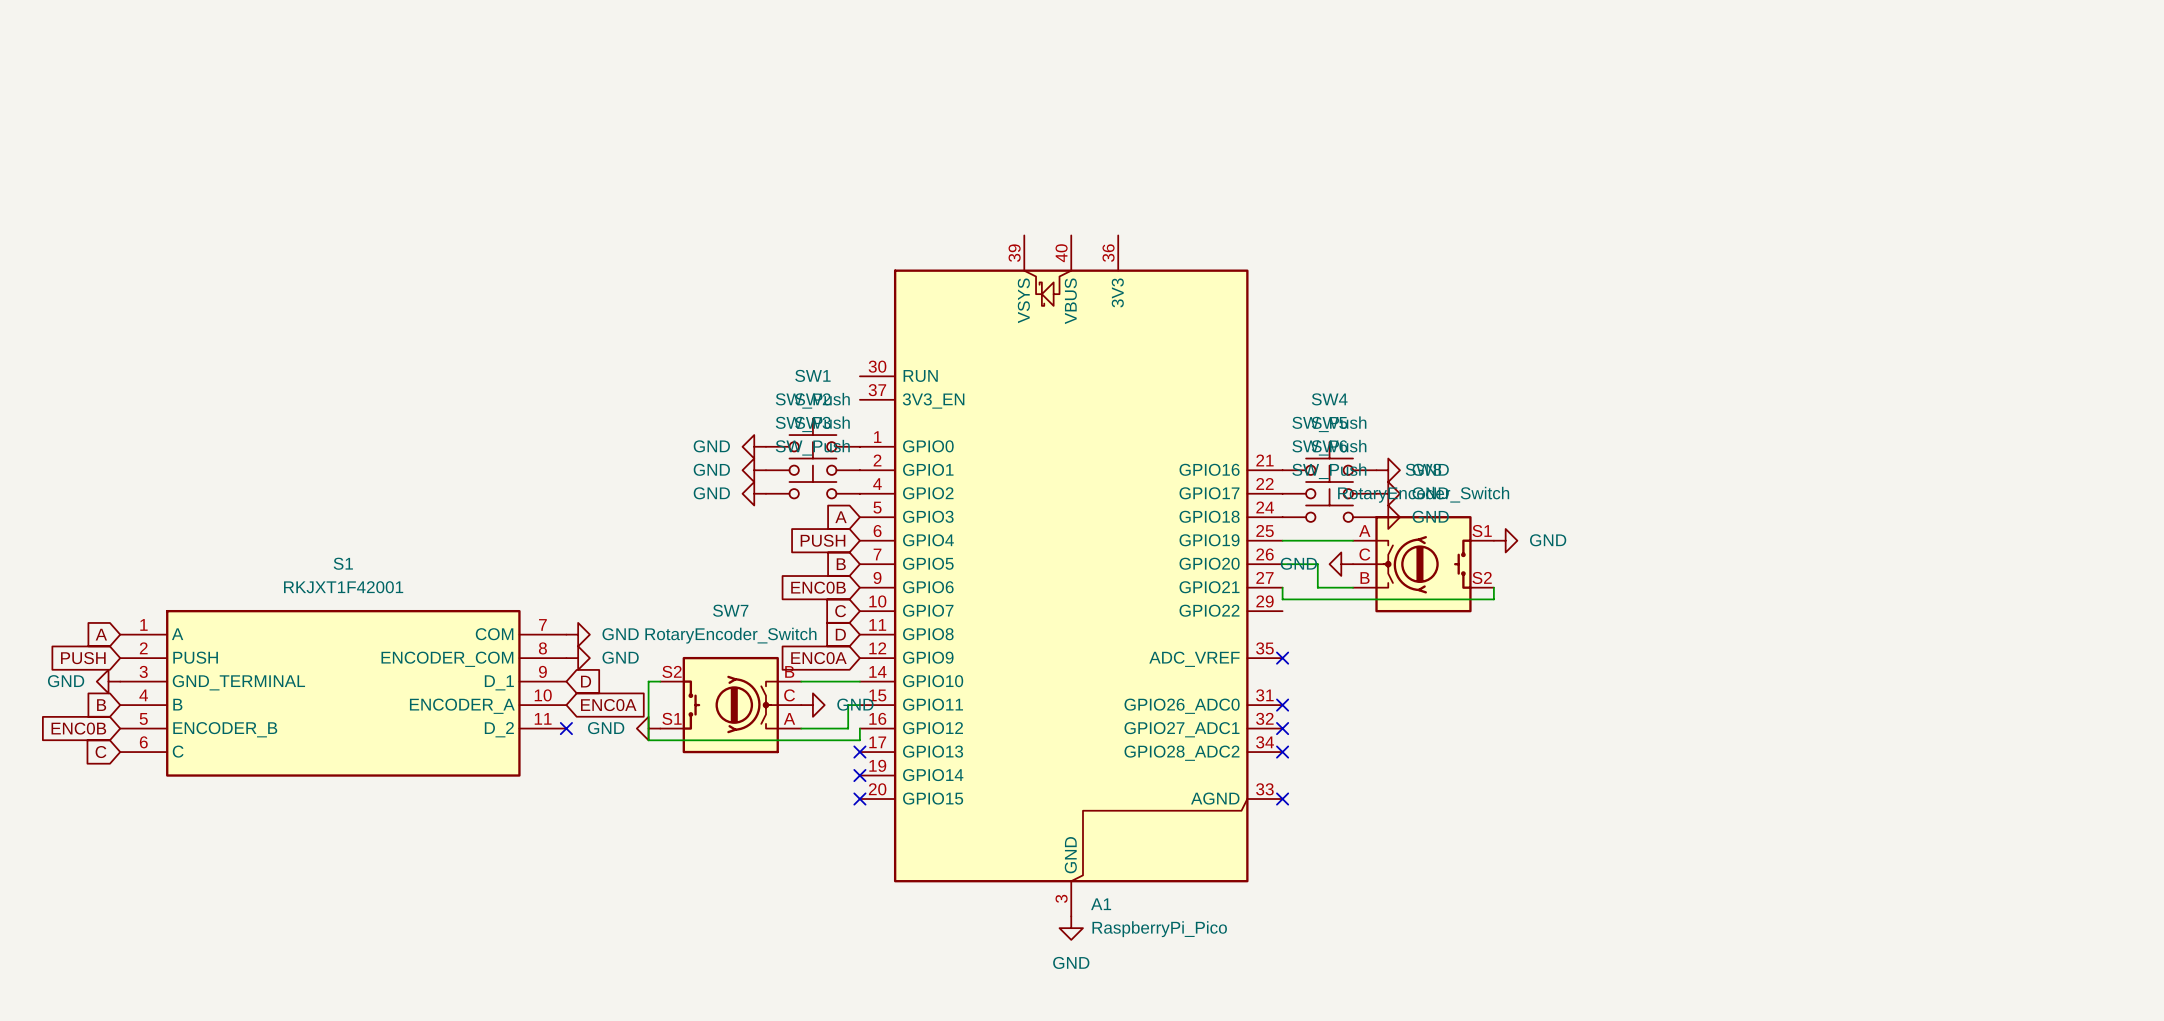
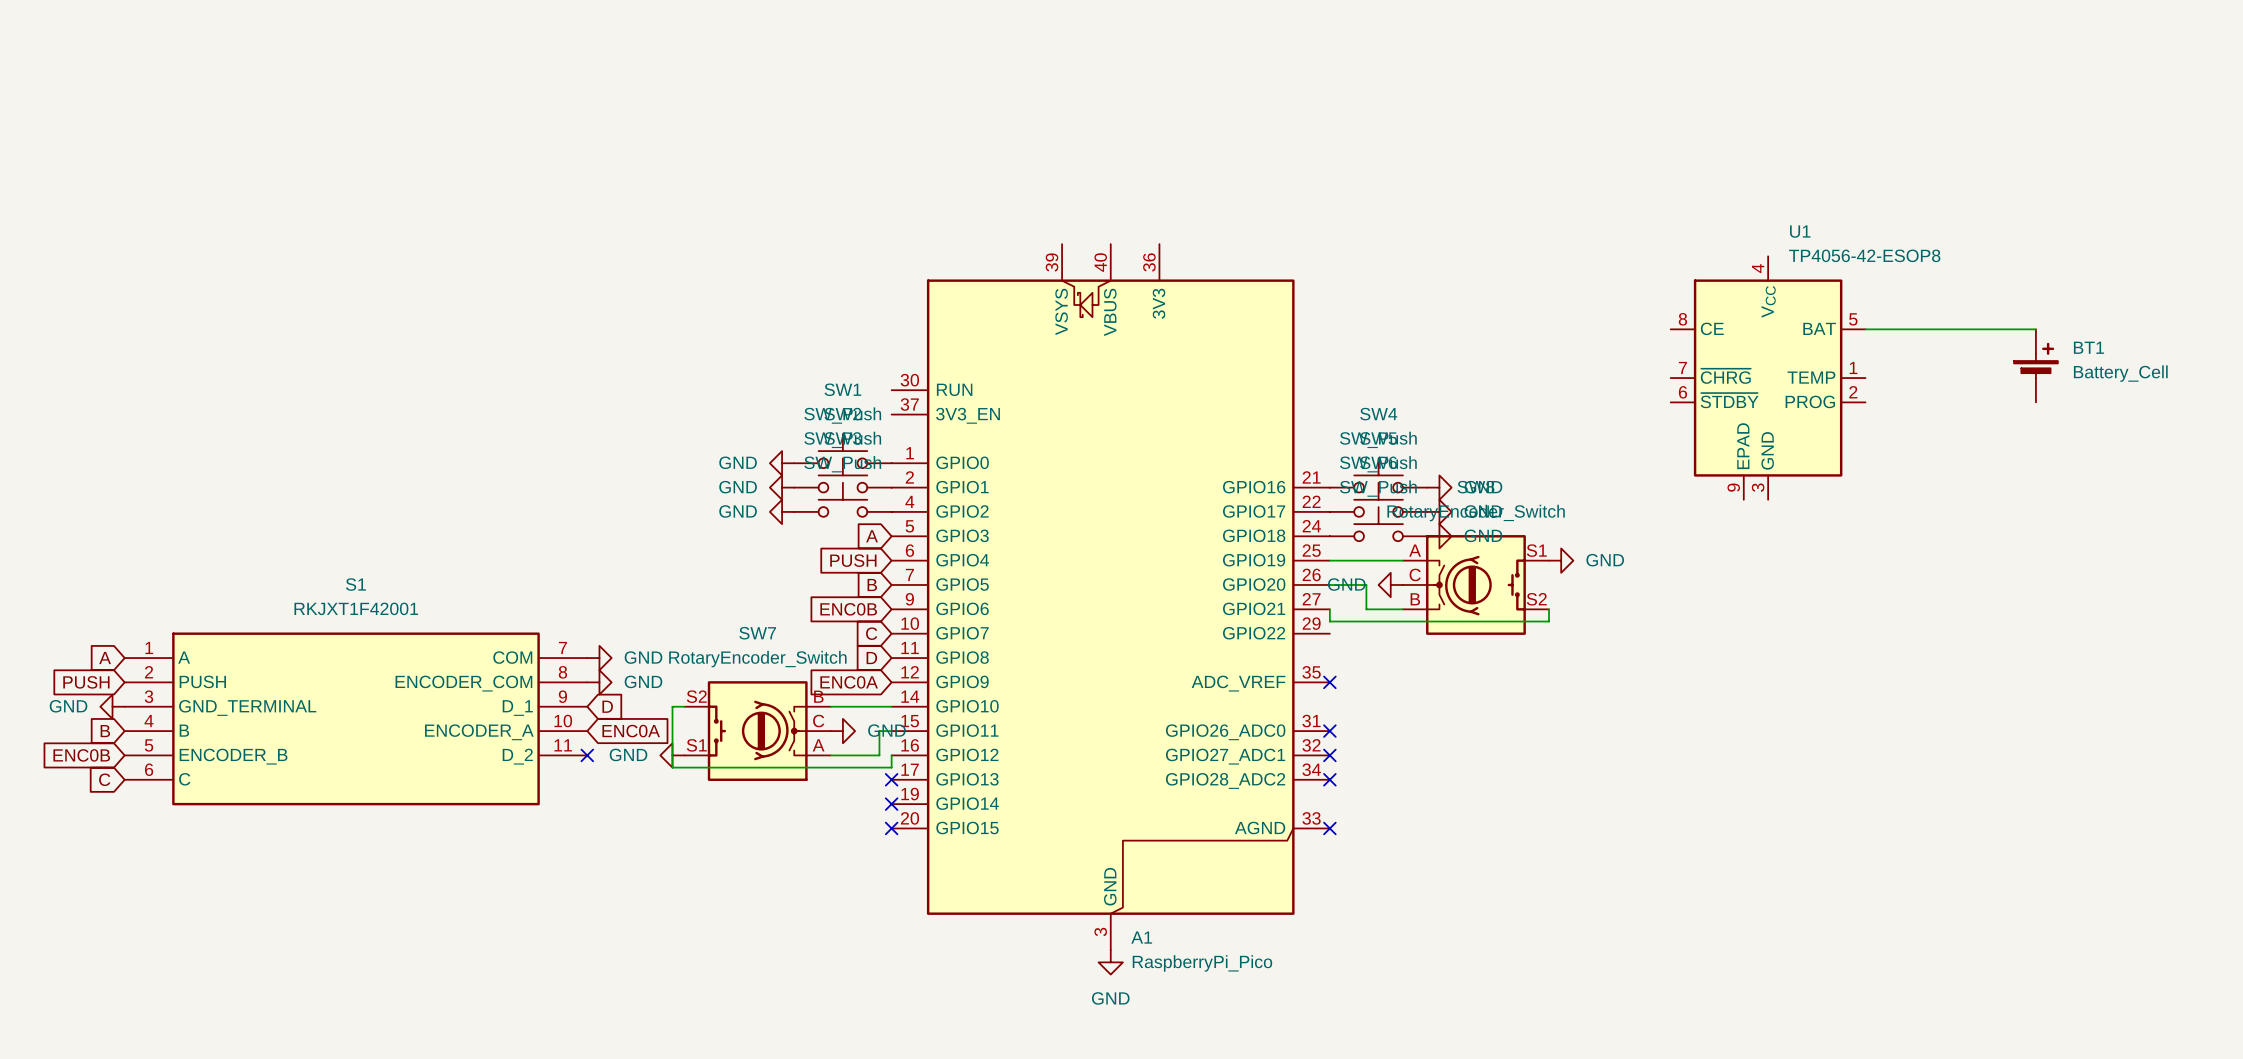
wire: none -> (1865, 329) (2035, 329)
BT1: none -> Battery_Cell (2035, 365)
U1: none -> TP4056-42-ESOP8 (1768, 378)

